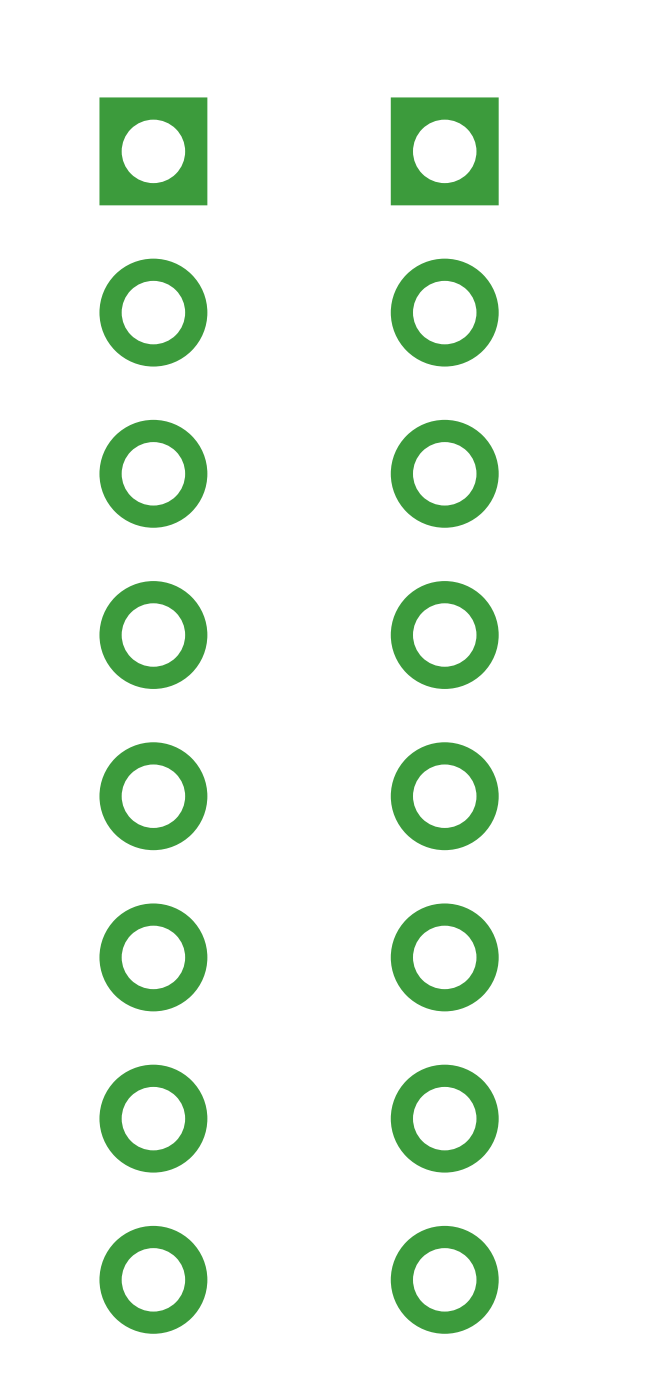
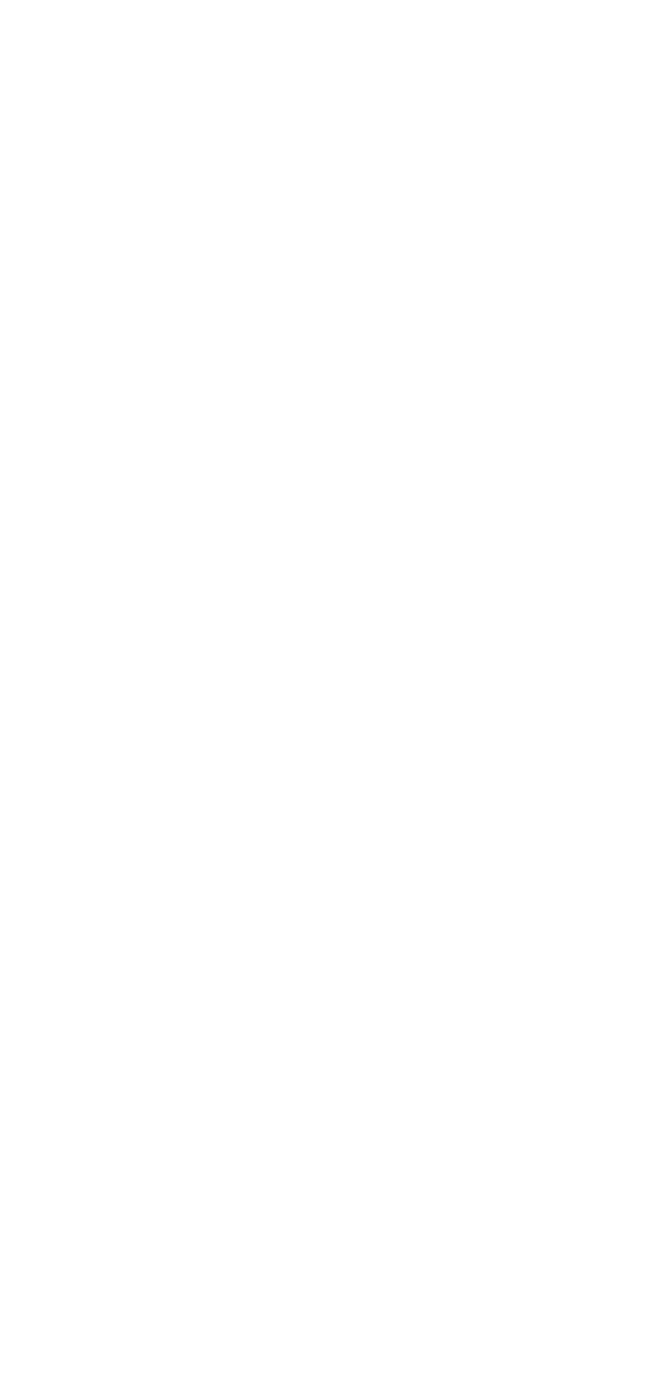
part: (153, 715) -> none
part: (444, 715) -> none

